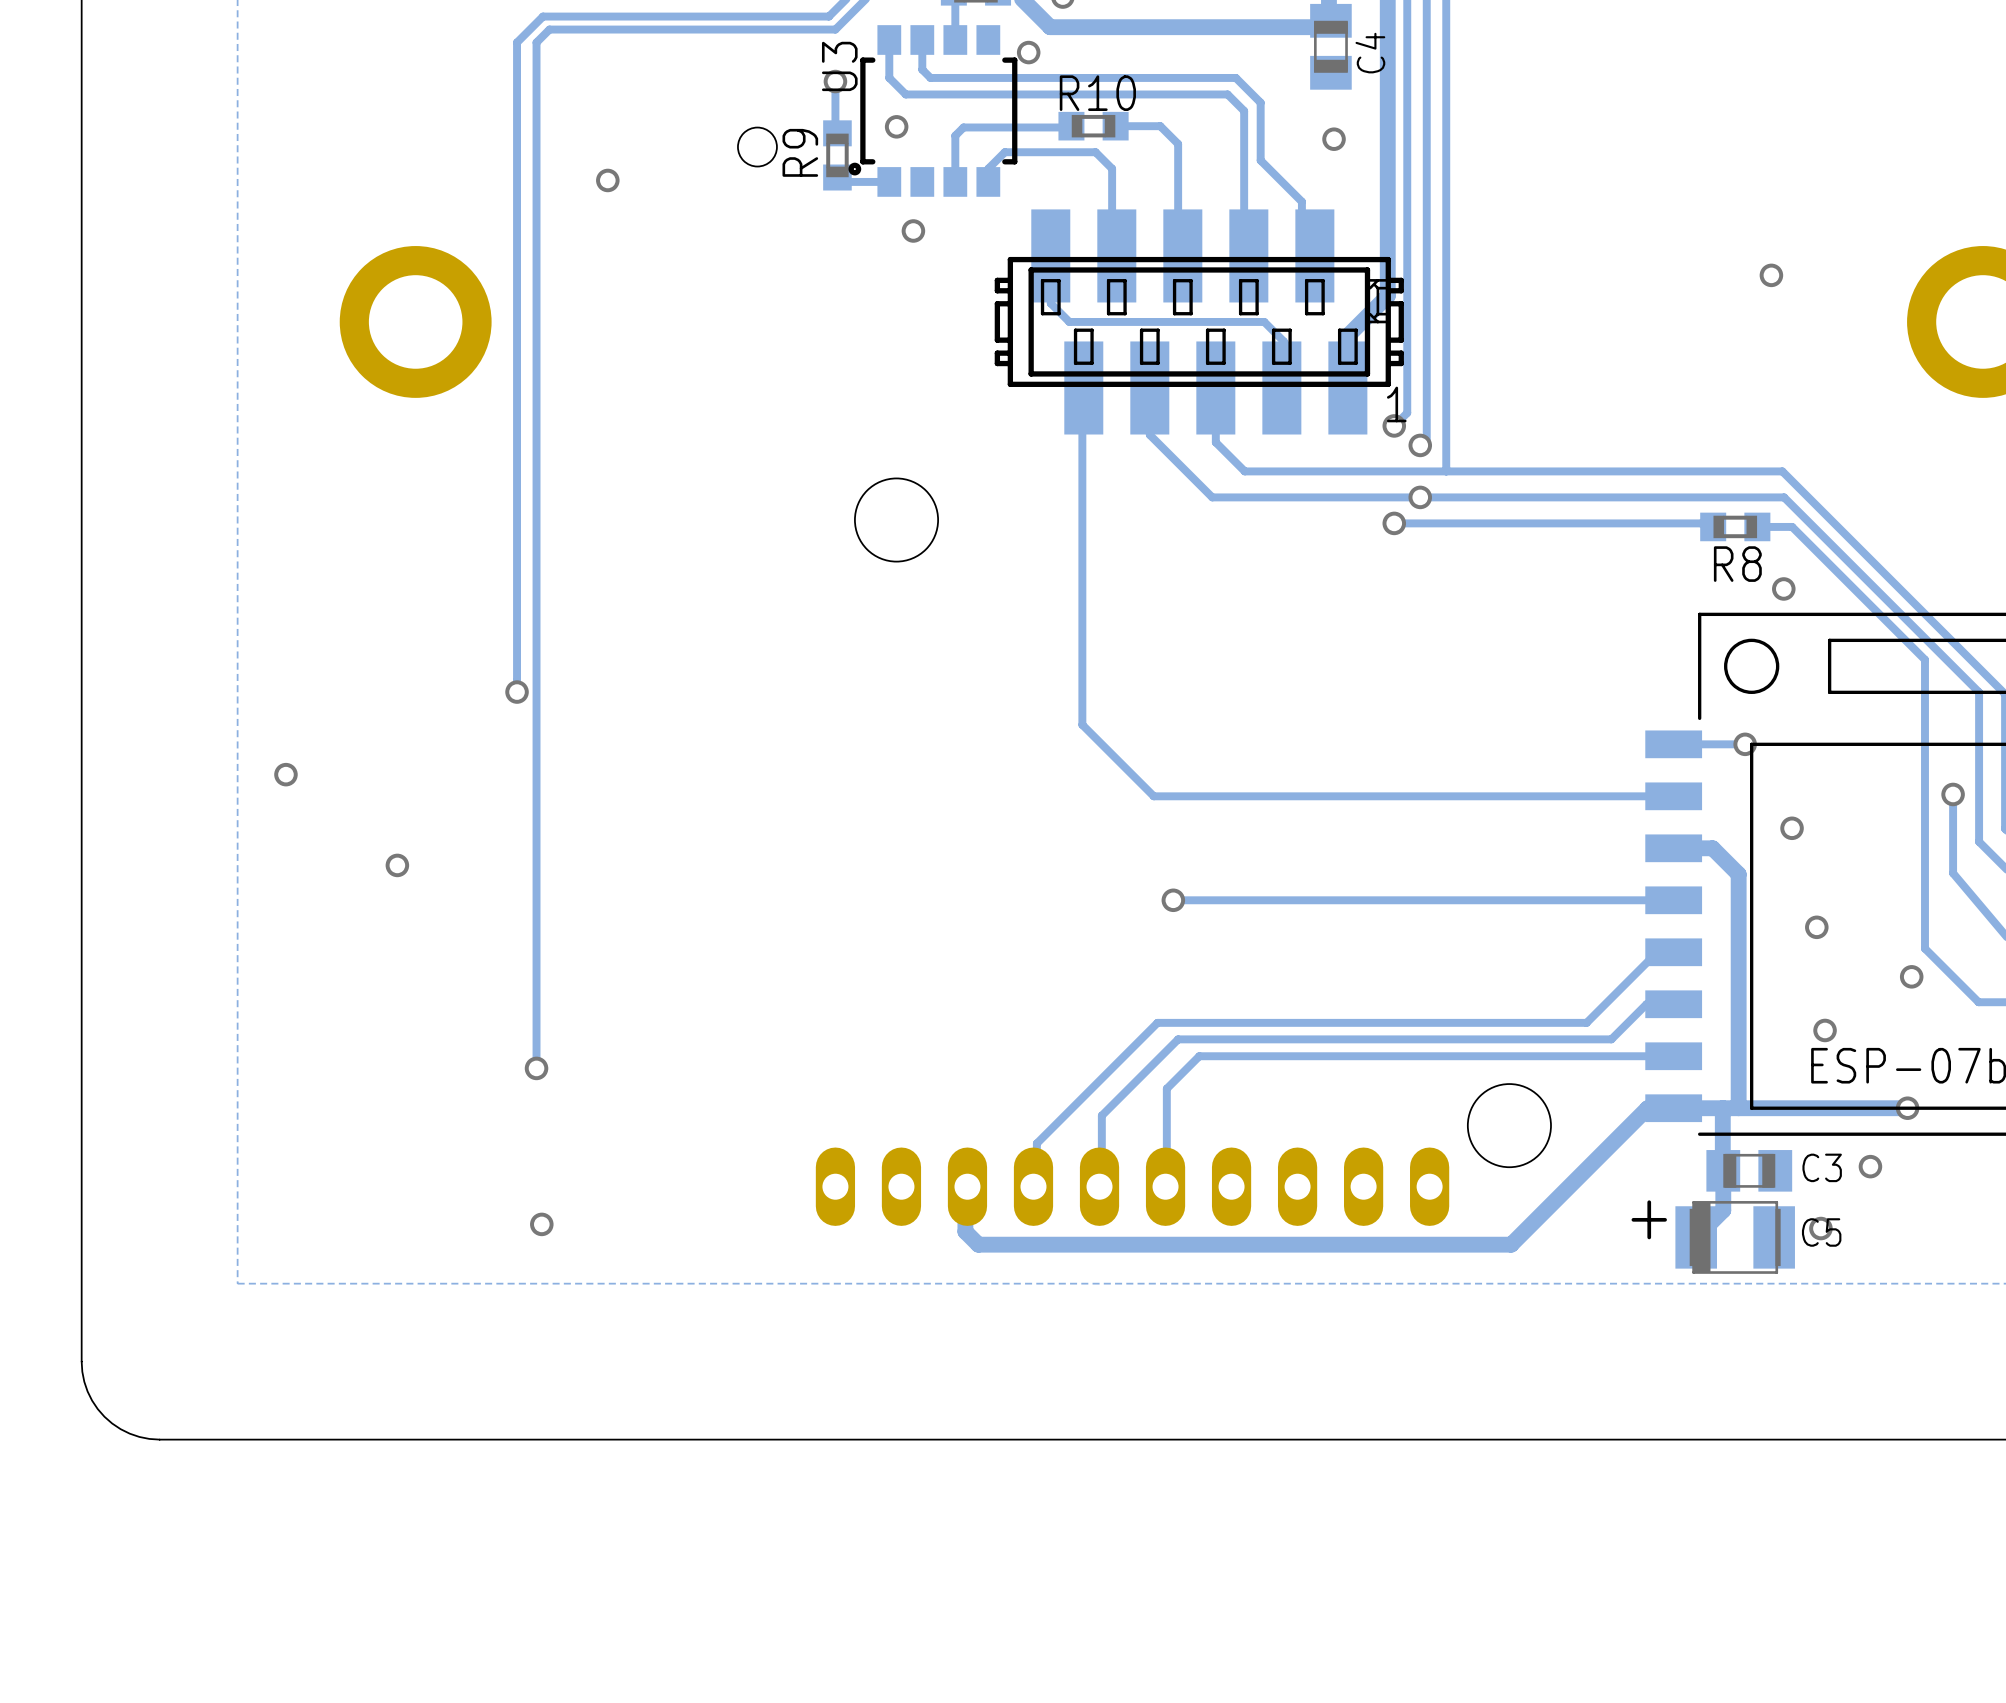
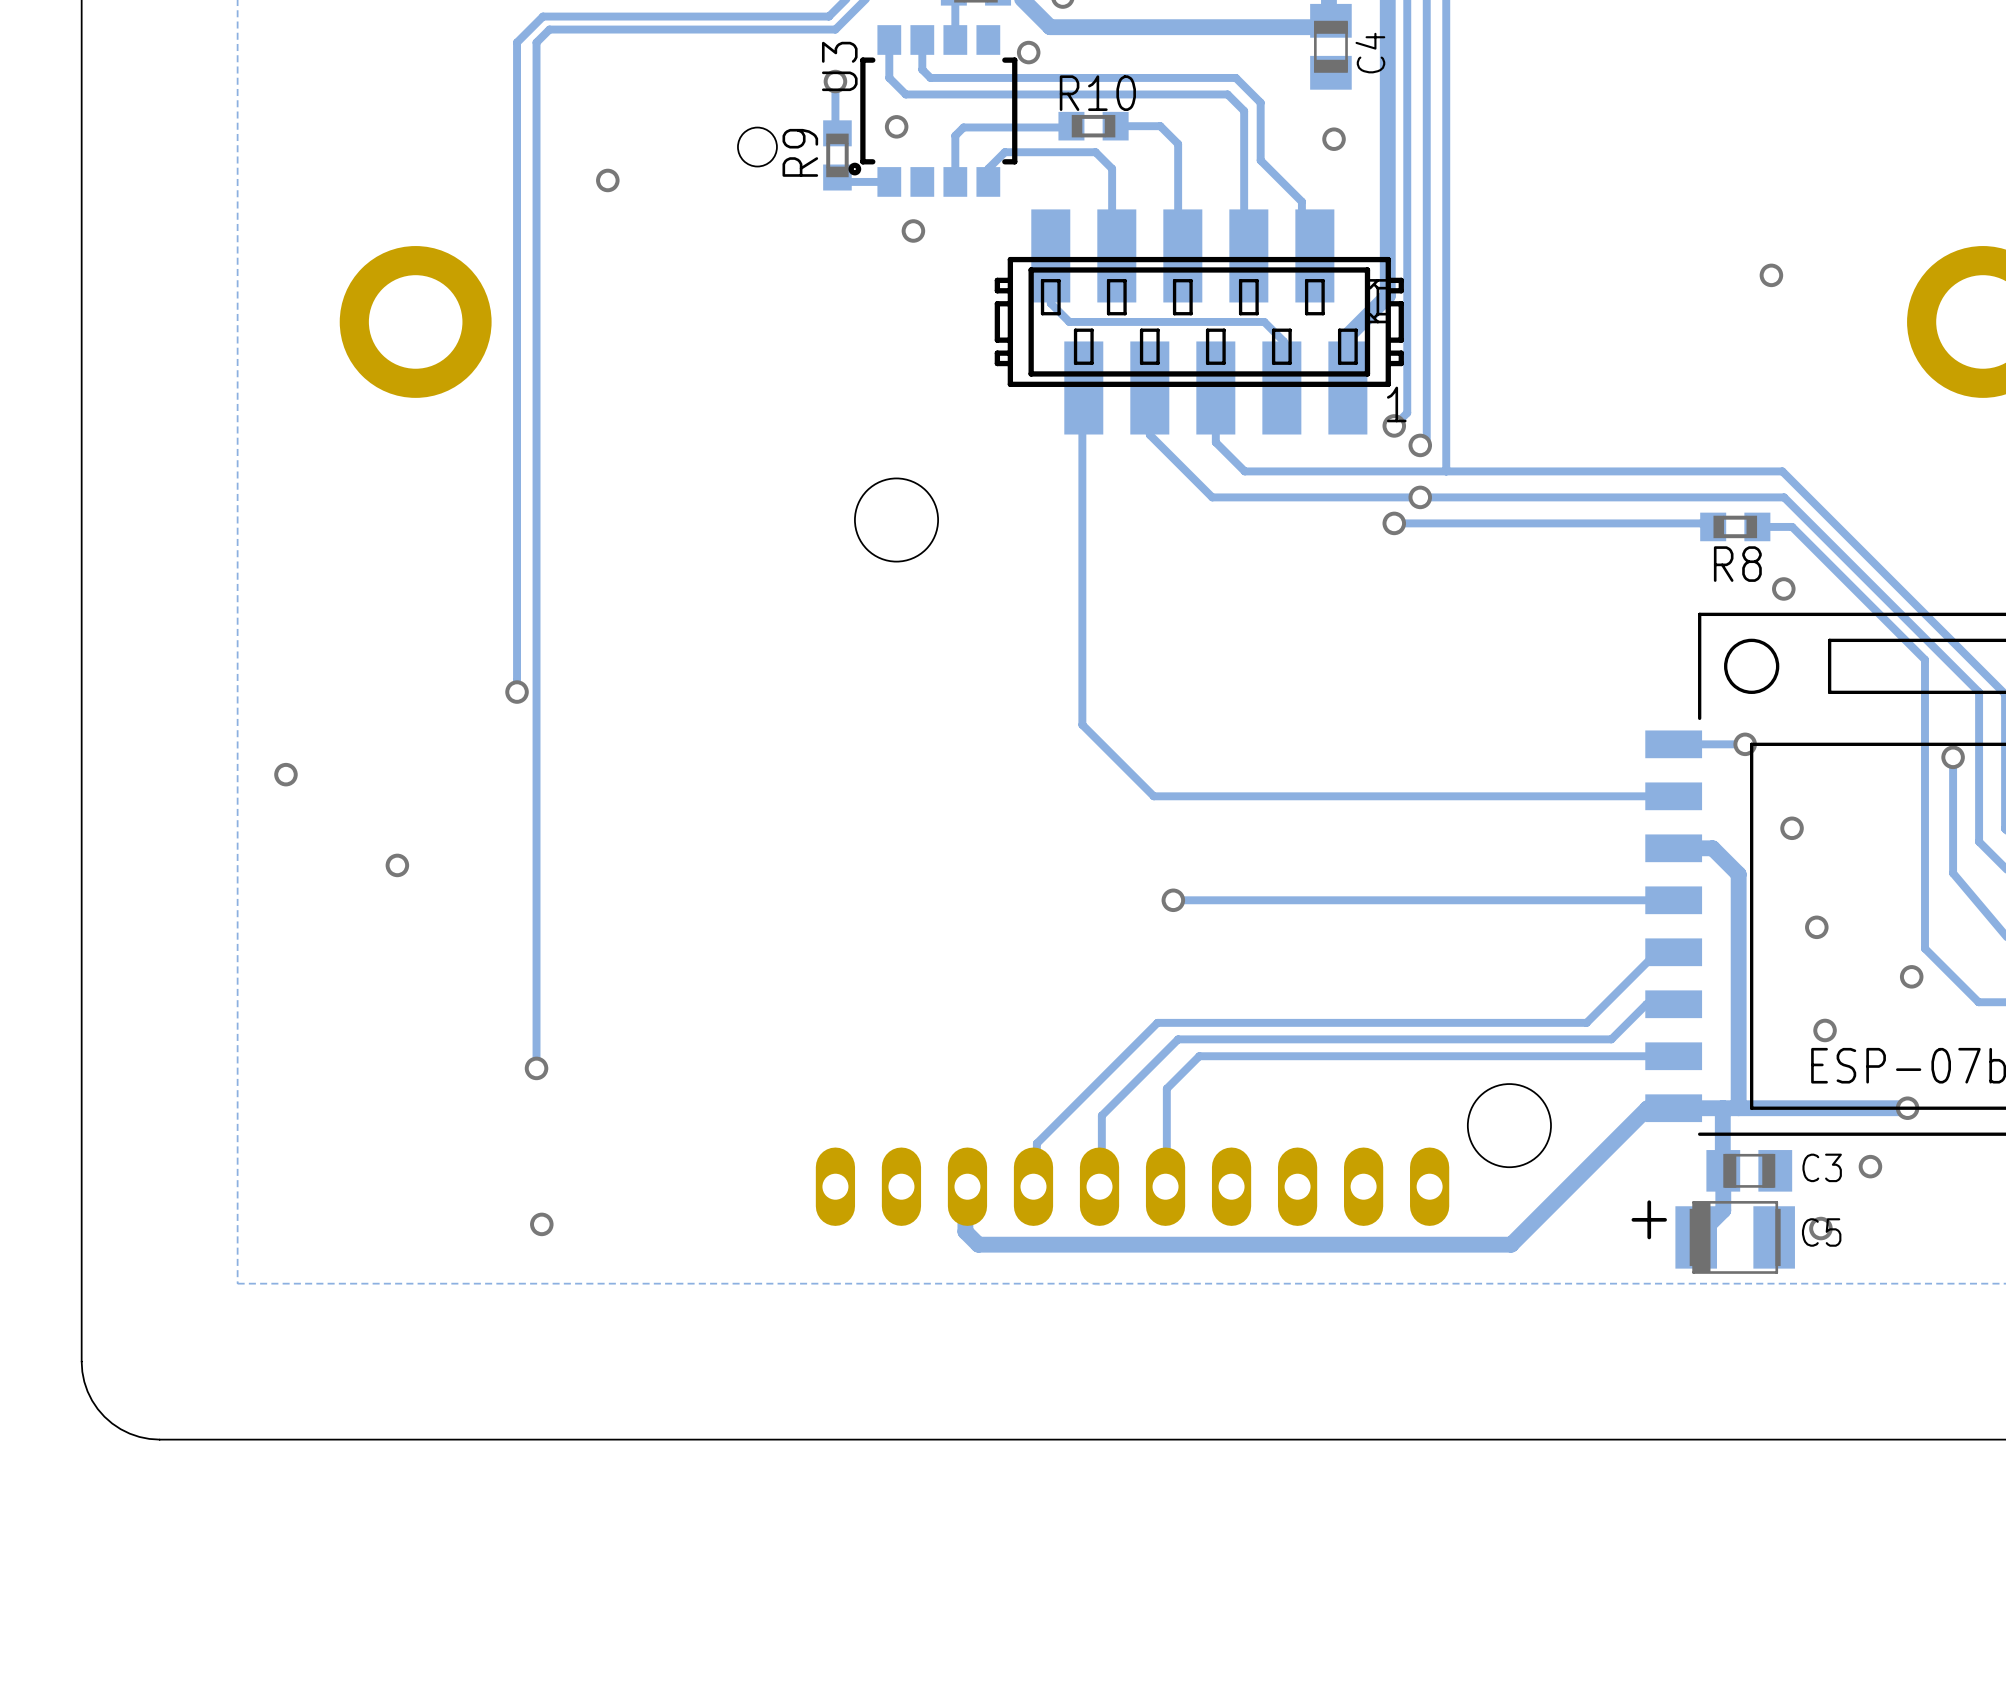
track: none -> (1953, 757) (1953, 794)
via position: (1953, 794) -> (1953, 757)

